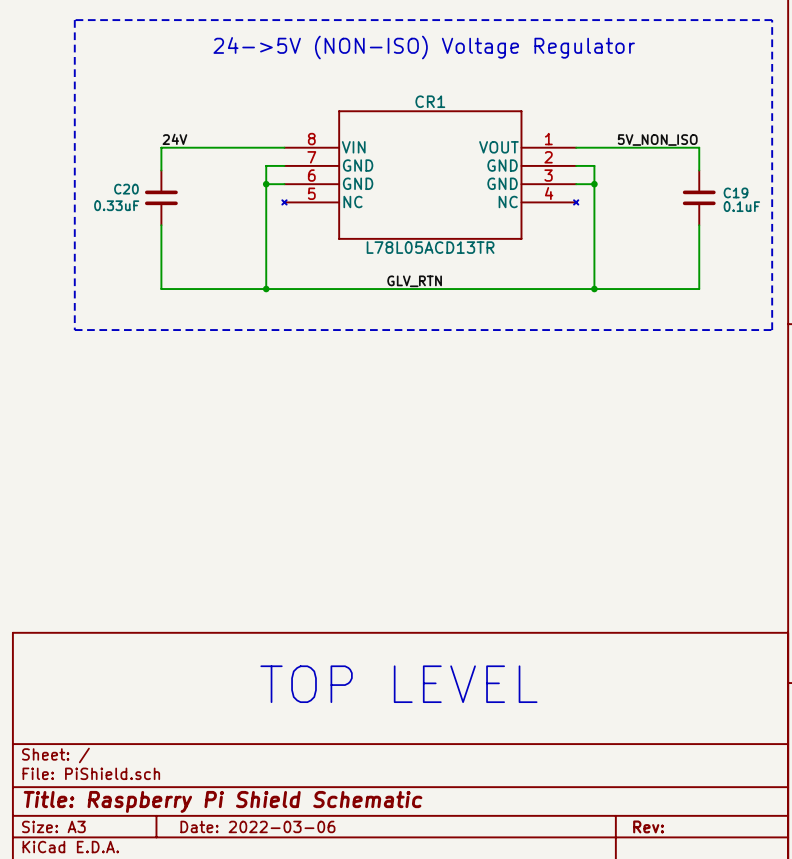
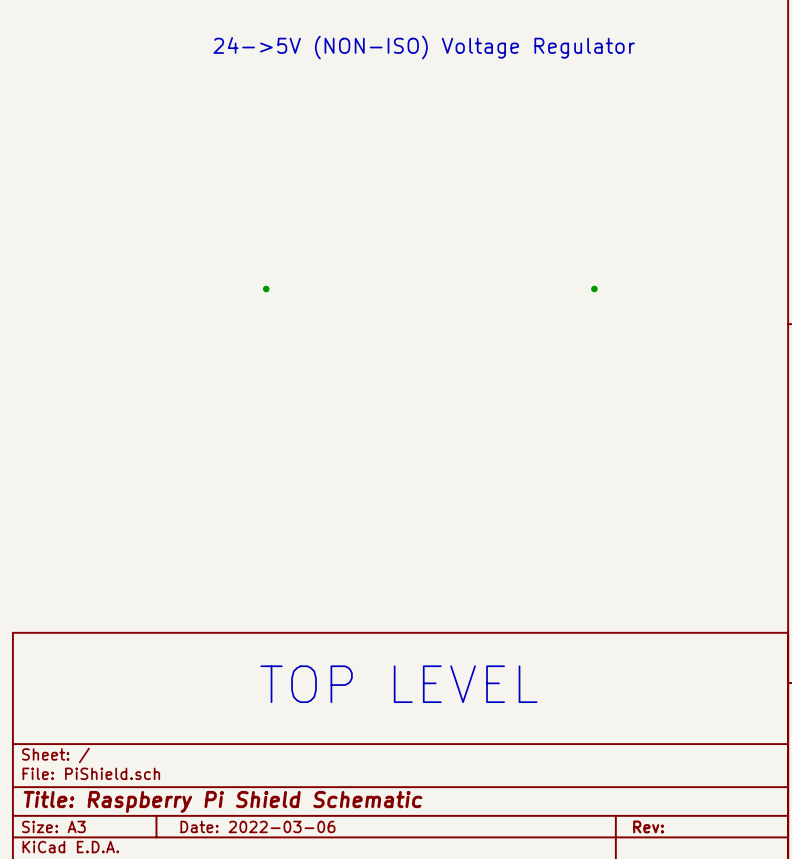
line: (74, 20) (772, 20) (772, 330) (74, 330) (74, 20) -> none
label: 24V (174, 139) -> none
label: 5V_NON_ISO (657, 140) -> none
wire: (284, 147) (161, 147) (161, 170) -> none
wire: (576, 147) (699, 147) (699, 170) -> none
wire: (284, 165) (266, 165) (266, 289) -> none
wire: (576, 165) (594, 165) (594, 289) -> none
CR1: L78L05ACD13TR (430, 175) -> none
wire: (266, 184) (284, 184) -> none
junction: (266, 184) -> none
wire: (576, 184) (594, 184) -> none
junction: (594, 184) -> none
C20: 0.33uF (161, 197) -> none
C19: 0.1uF (699, 197) -> none
wire: (161, 225) (161, 289) (699, 289) (699, 225) -> none
label: GLV_RTN (414, 281) -> none

